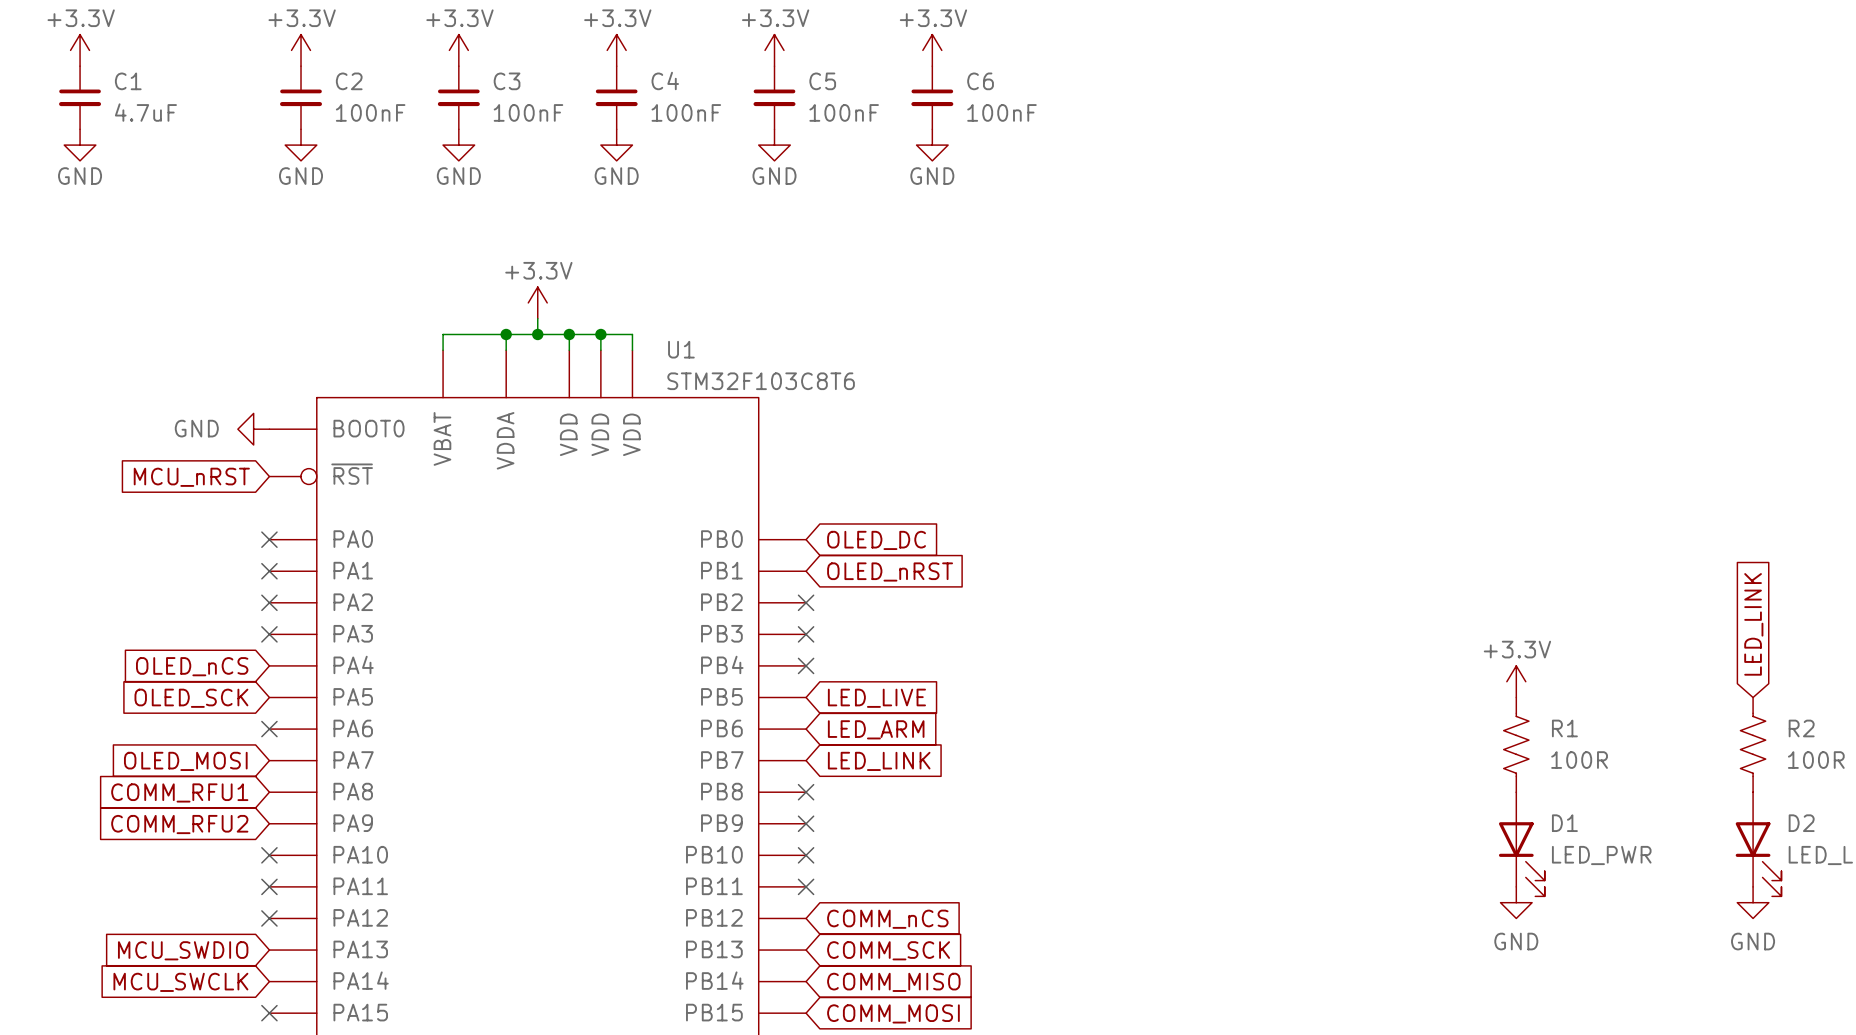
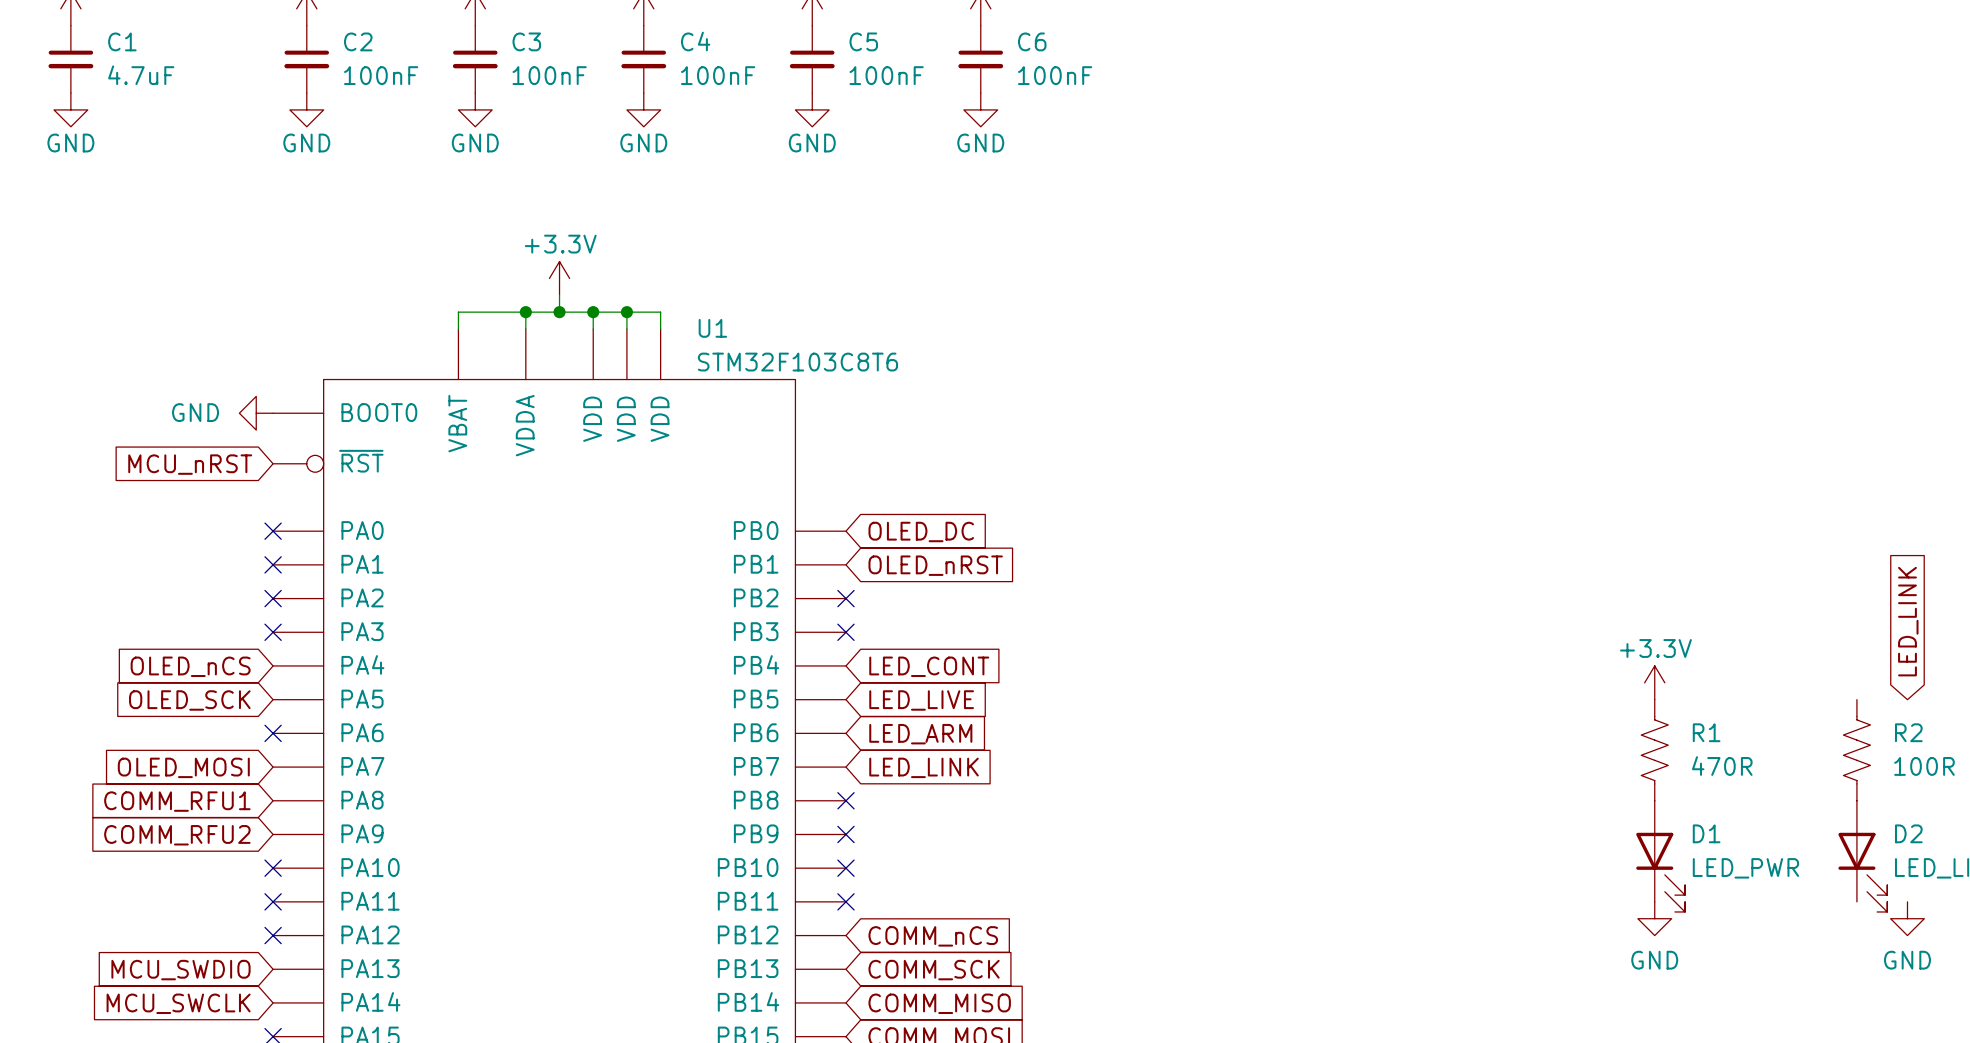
global label position: LED_LINK (1753, 624) -> LED_LINK (1908, 621)
no-connect mark: (806, 665) -> none
global label: none -> LED_CONT (929, 666)
power symbol position: +3.3V (1516, 681) -> +3.3V (1654, 682)
R1 position: (1516, 744) -> (1654, 750)
R1 value: 100R (1579, 760) -> 470R (1722, 766)
D1 position: (1521, 844) -> (1660, 856)
power symbol position: GND (1516, 902) -> GND (1654, 918)
power symbol position: GND (1753, 902) -> GND (1907, 918)

